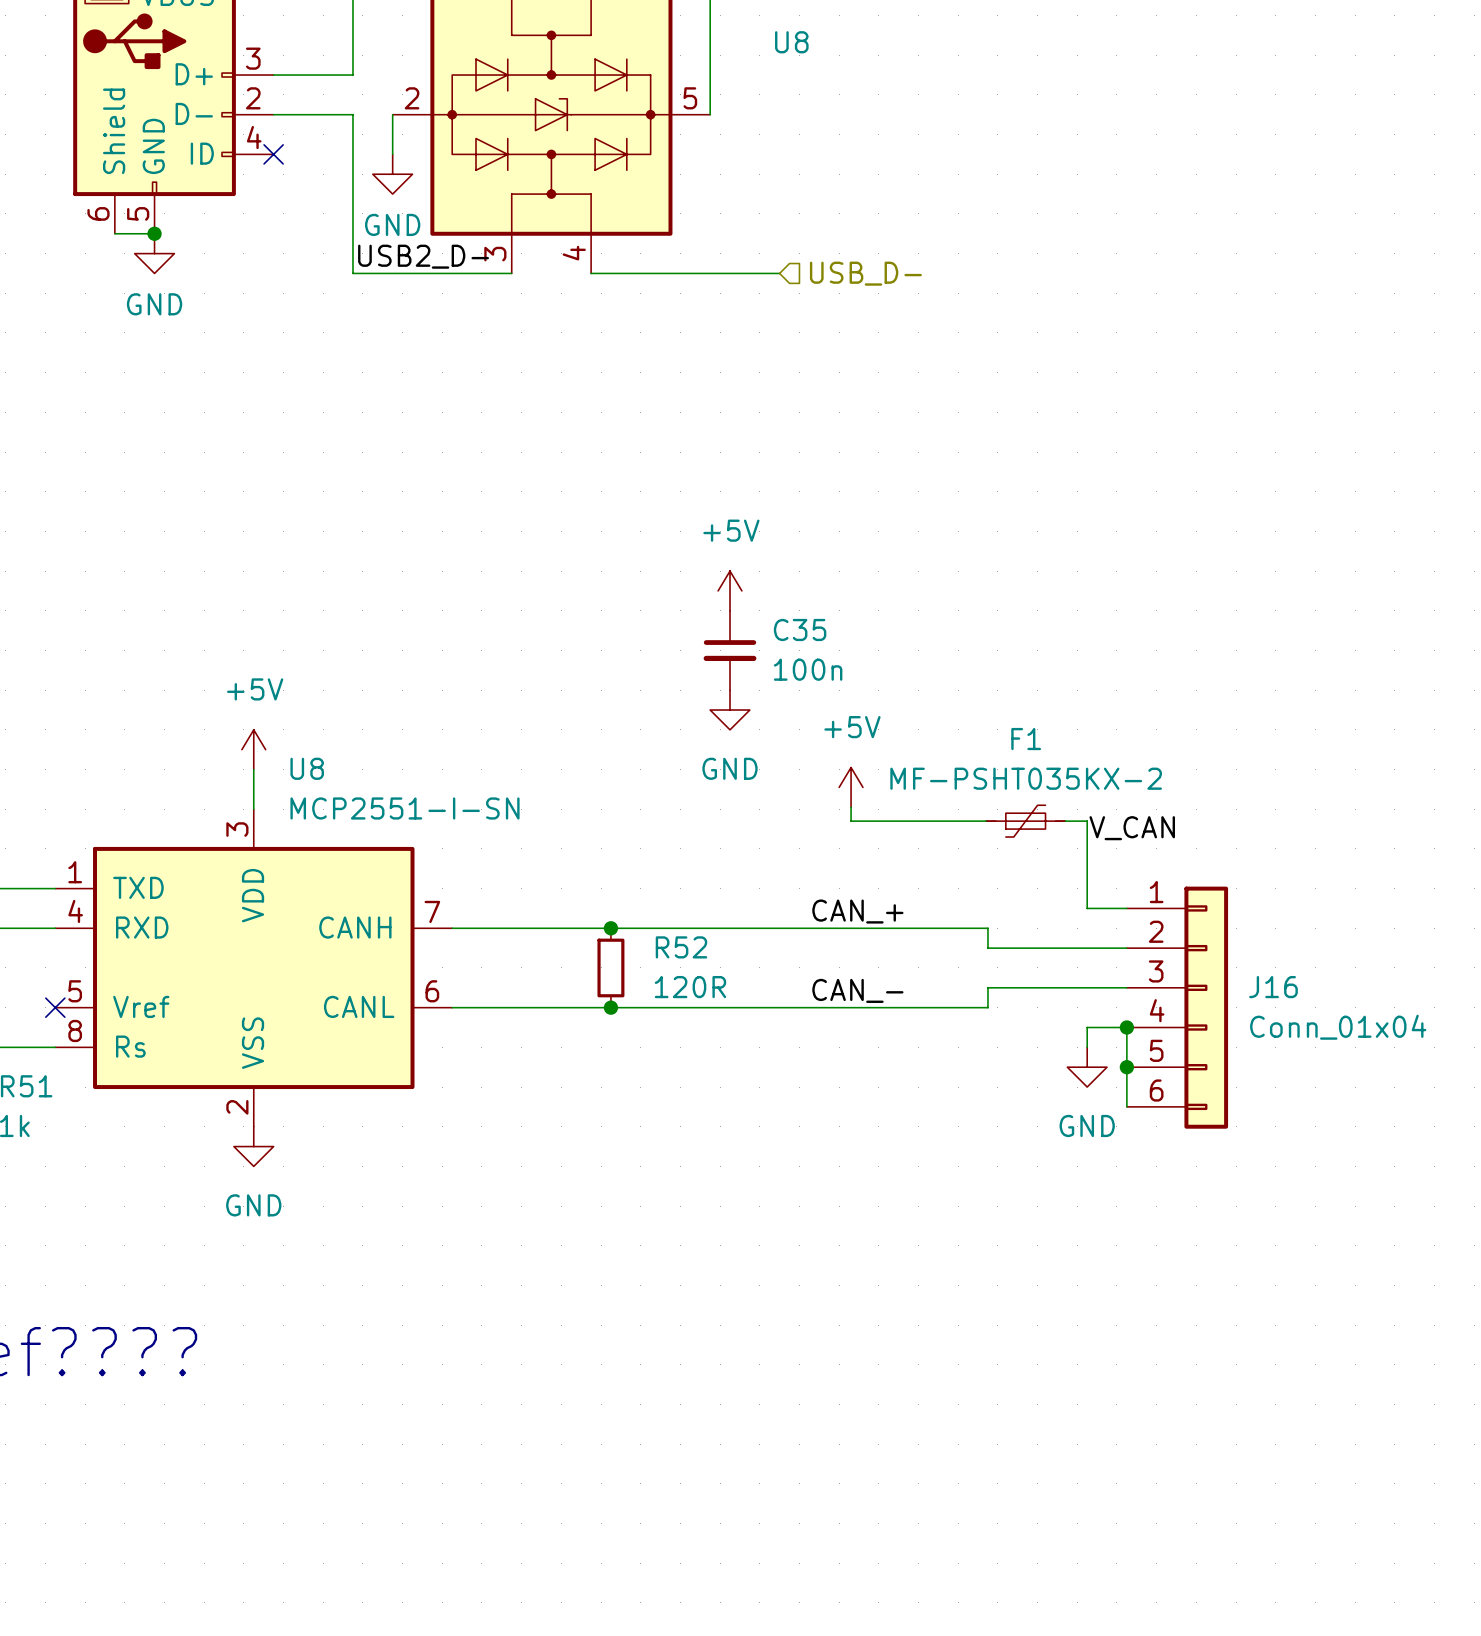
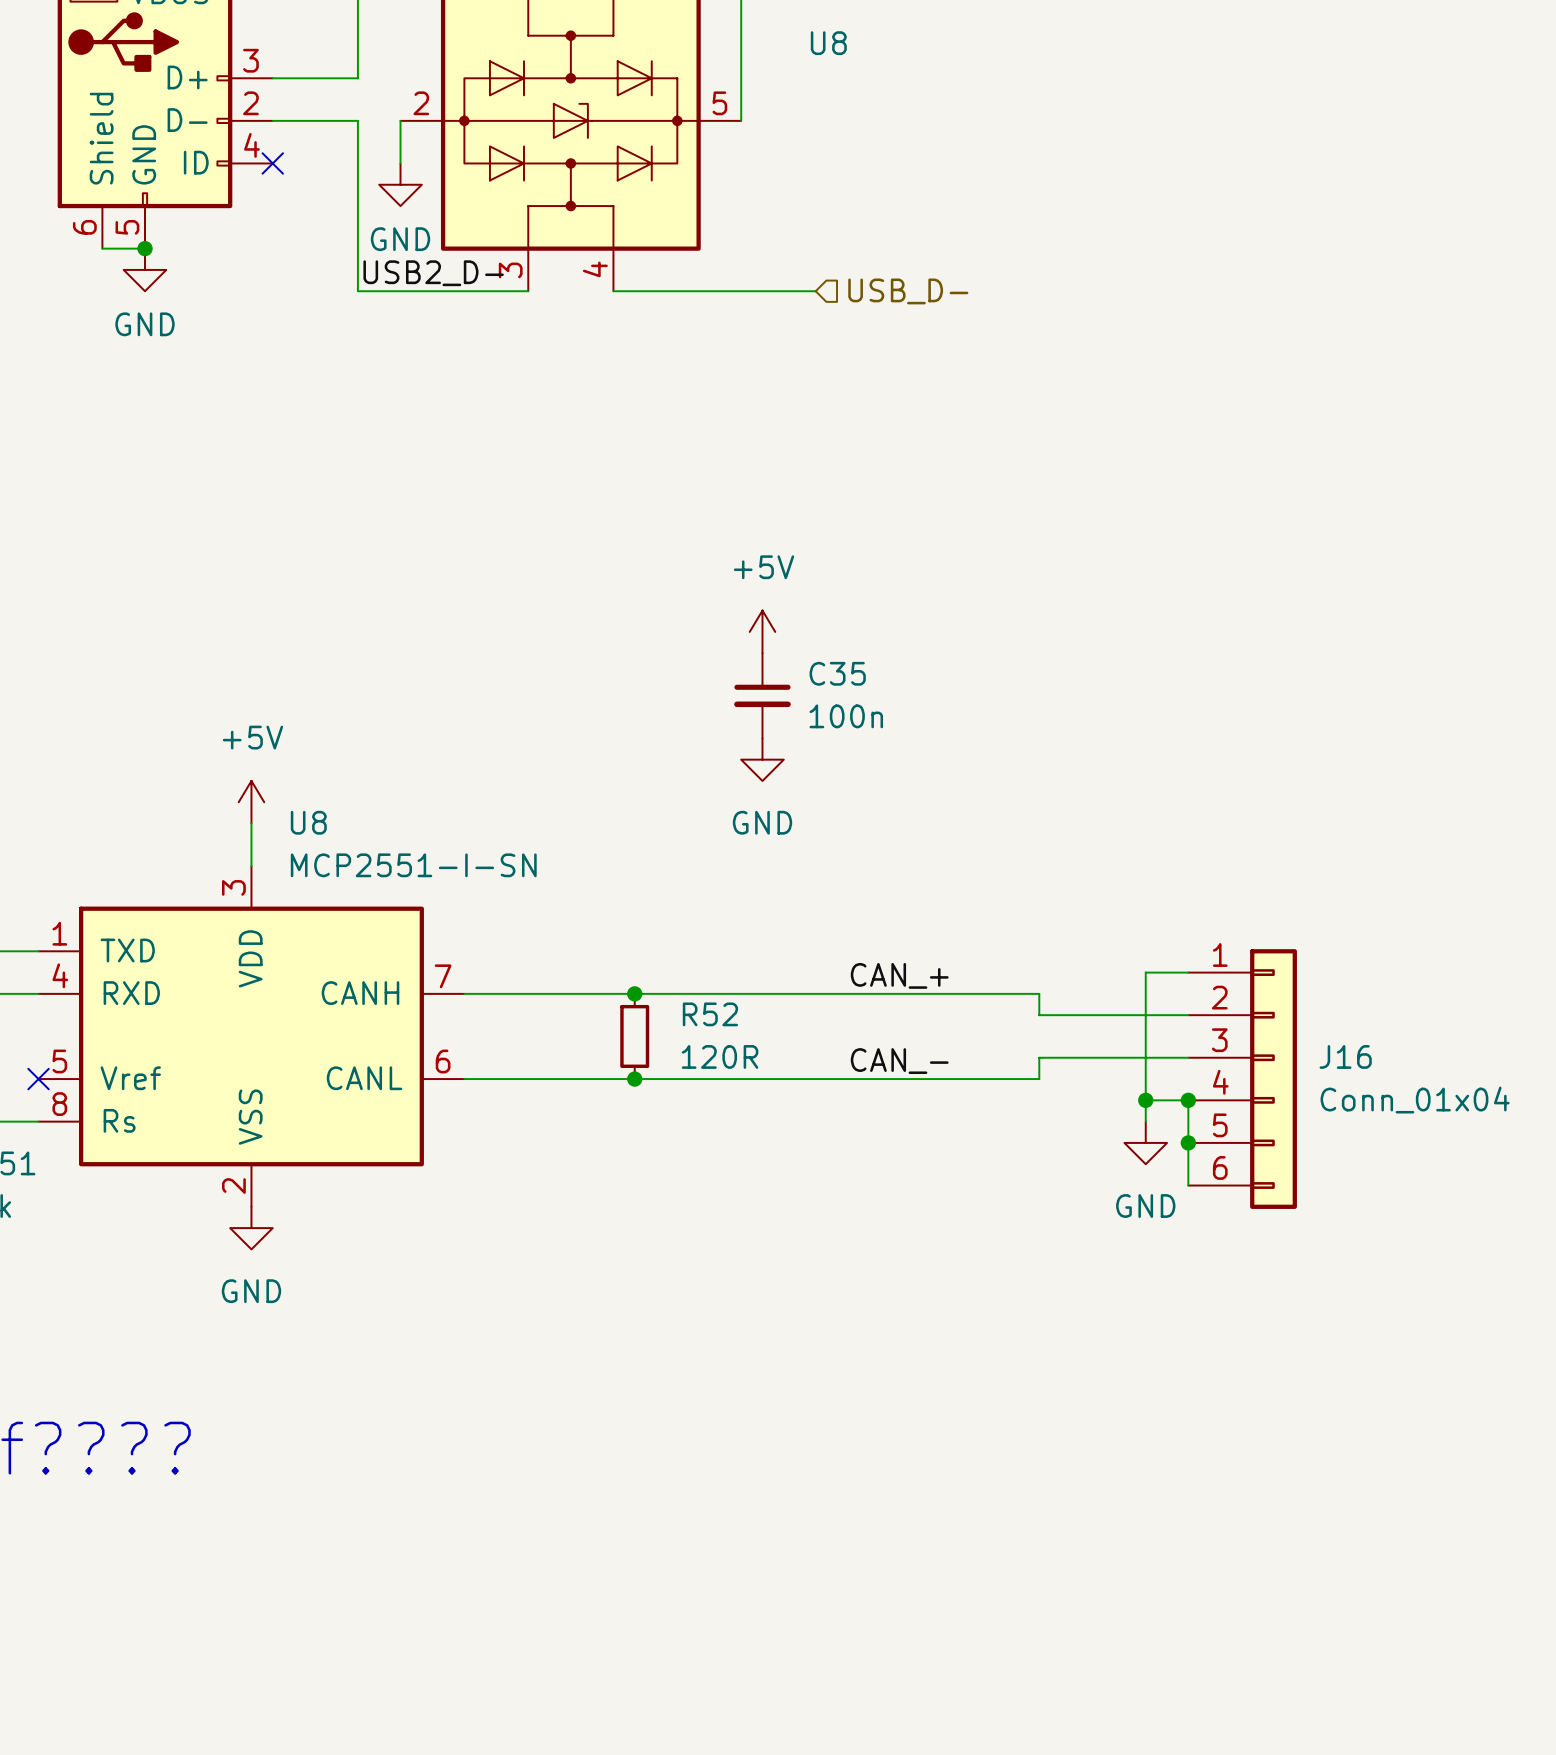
power symbol: +5V (851, 787) -> none
wire: (851, 807) (851, 821) (985, 821) -> none
F1: MF-PSHT035KX-2 (1025, 821) -> none
wire: (1065, 821) (1087, 821) (1087, 908) -> (1145, 1100) (1145, 972)
label: V_CAN (1132, 828) -> none
junction: none -> (1145, 1100)

